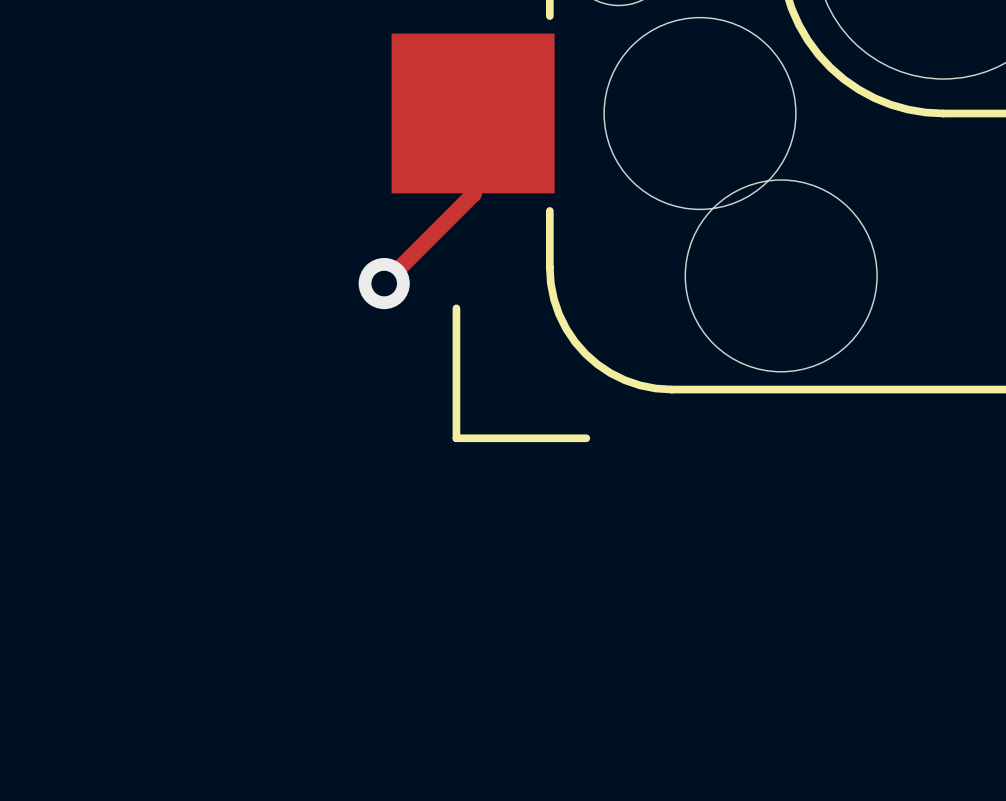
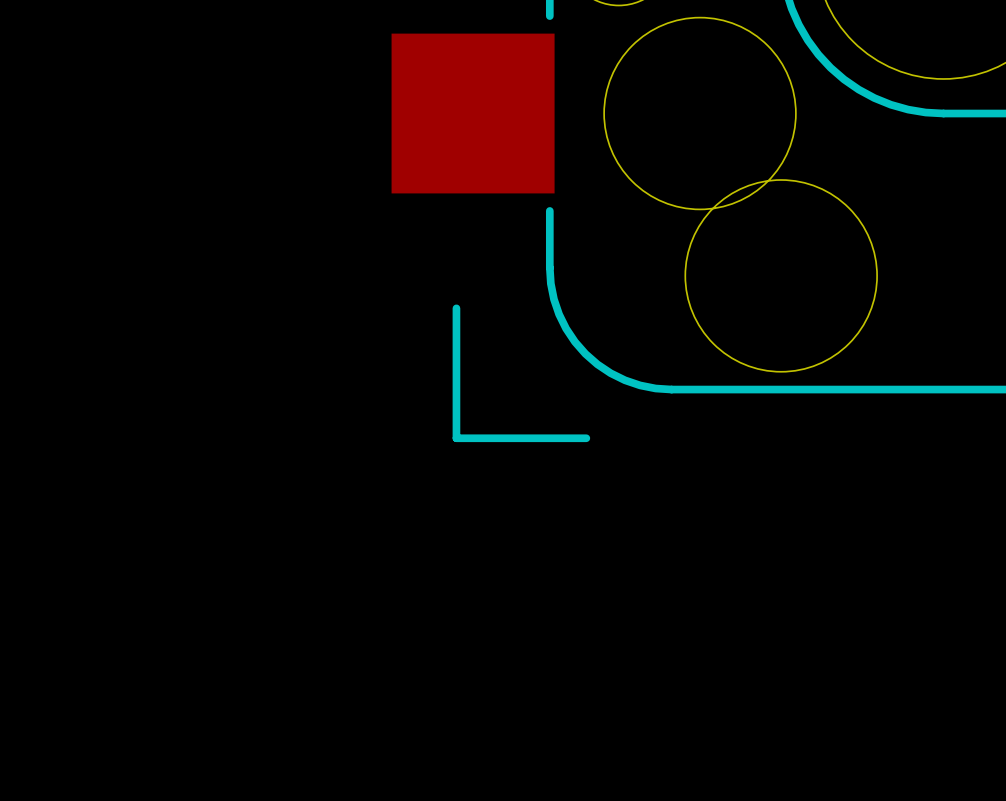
track: (473, 130) (473, 194) (384, 283) -> none
via: (384, 283) -> none

